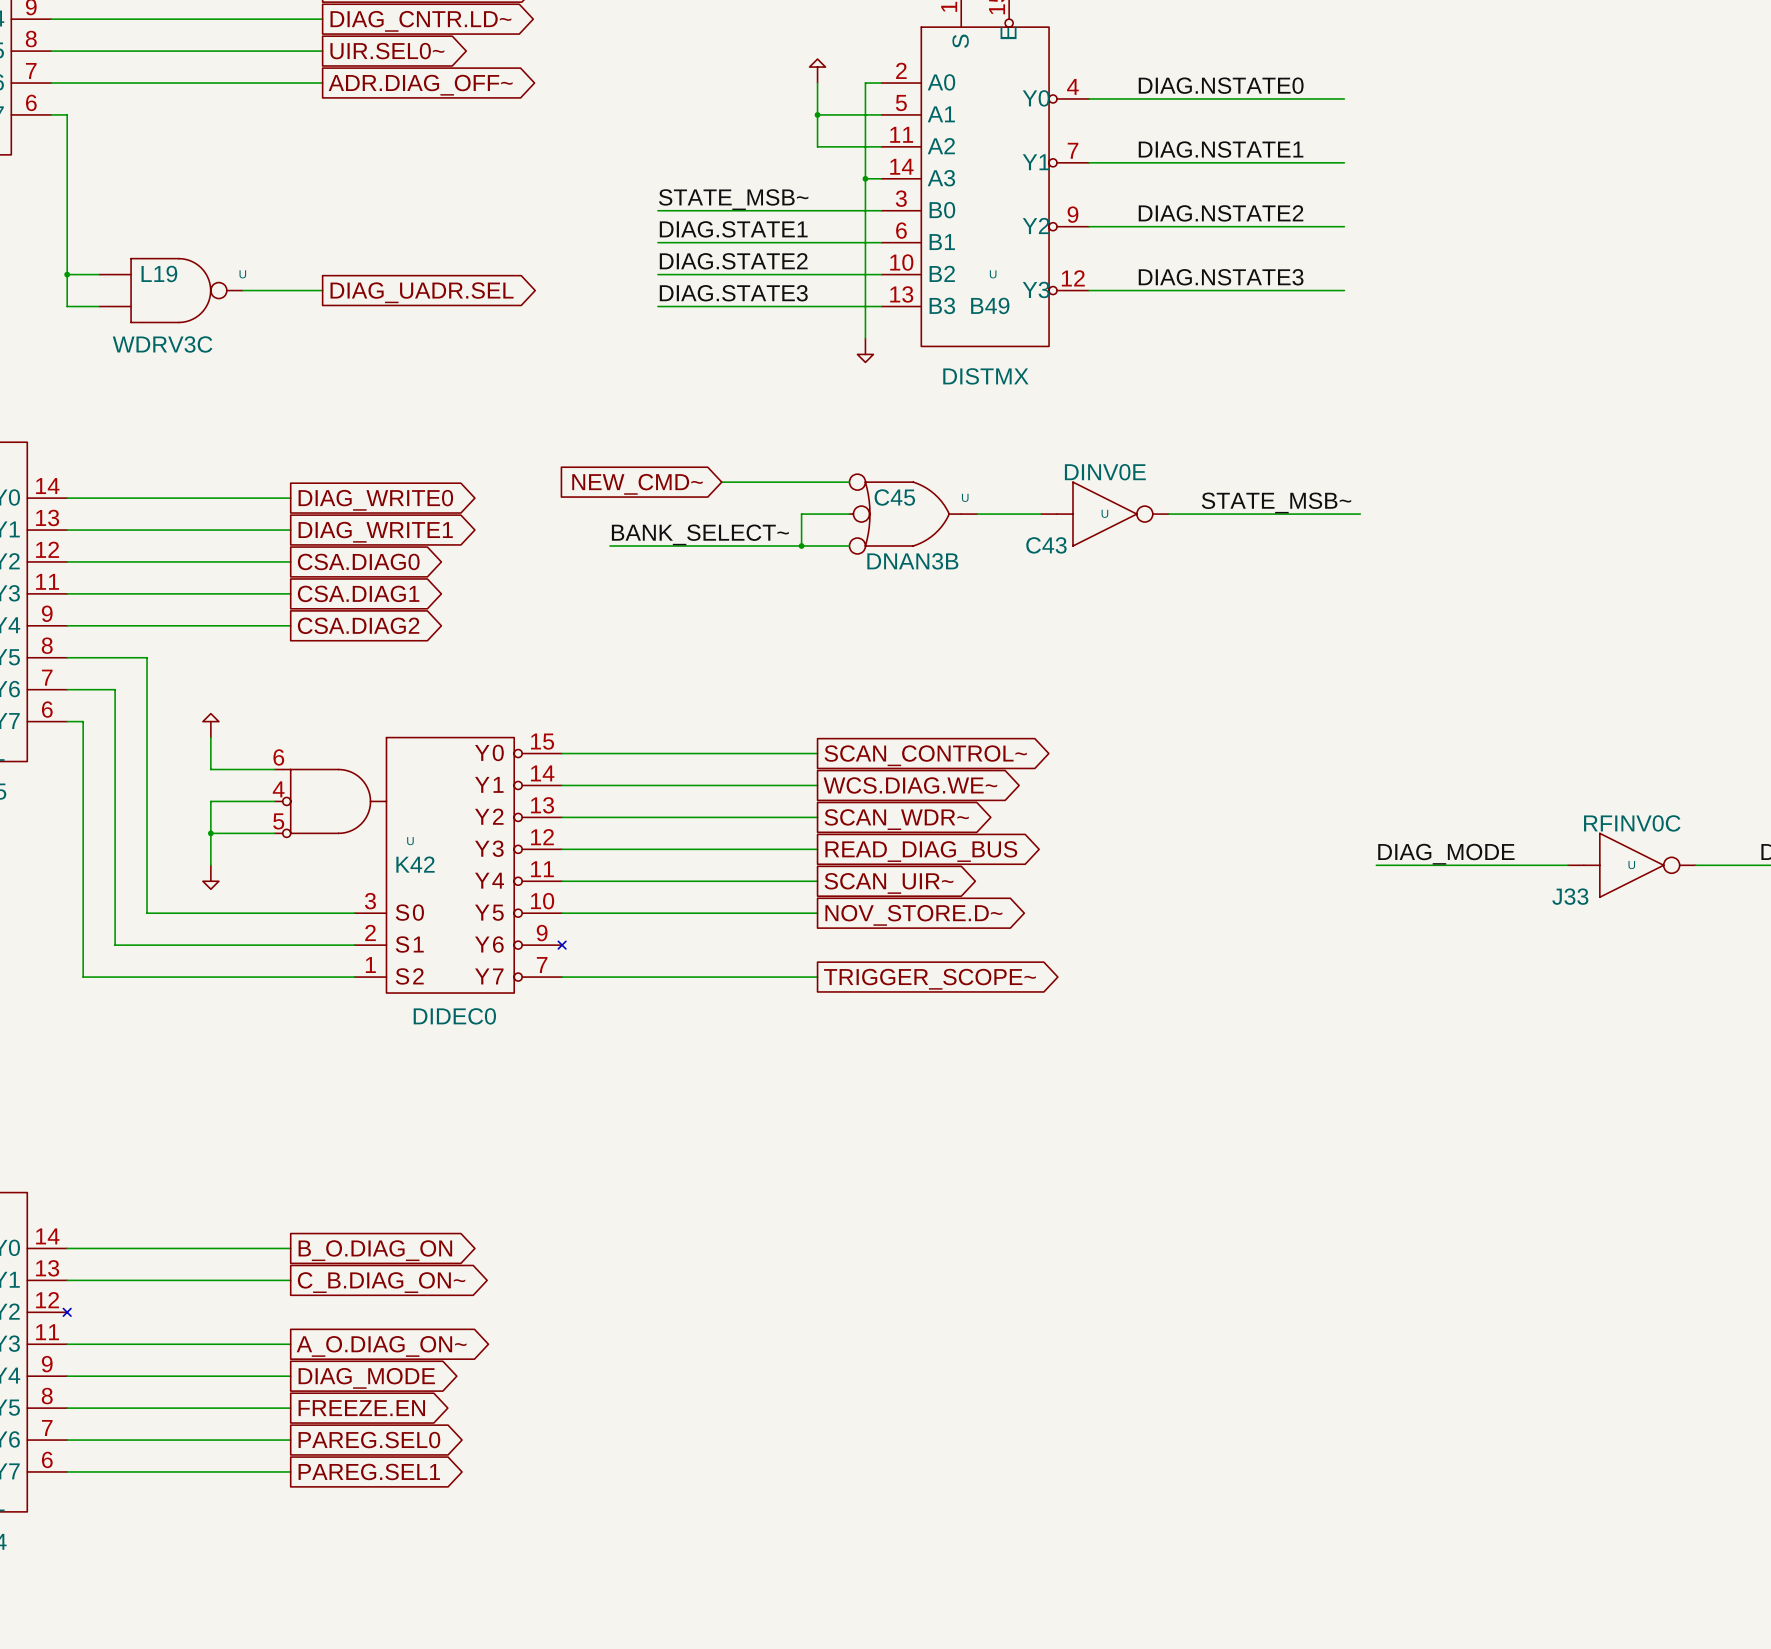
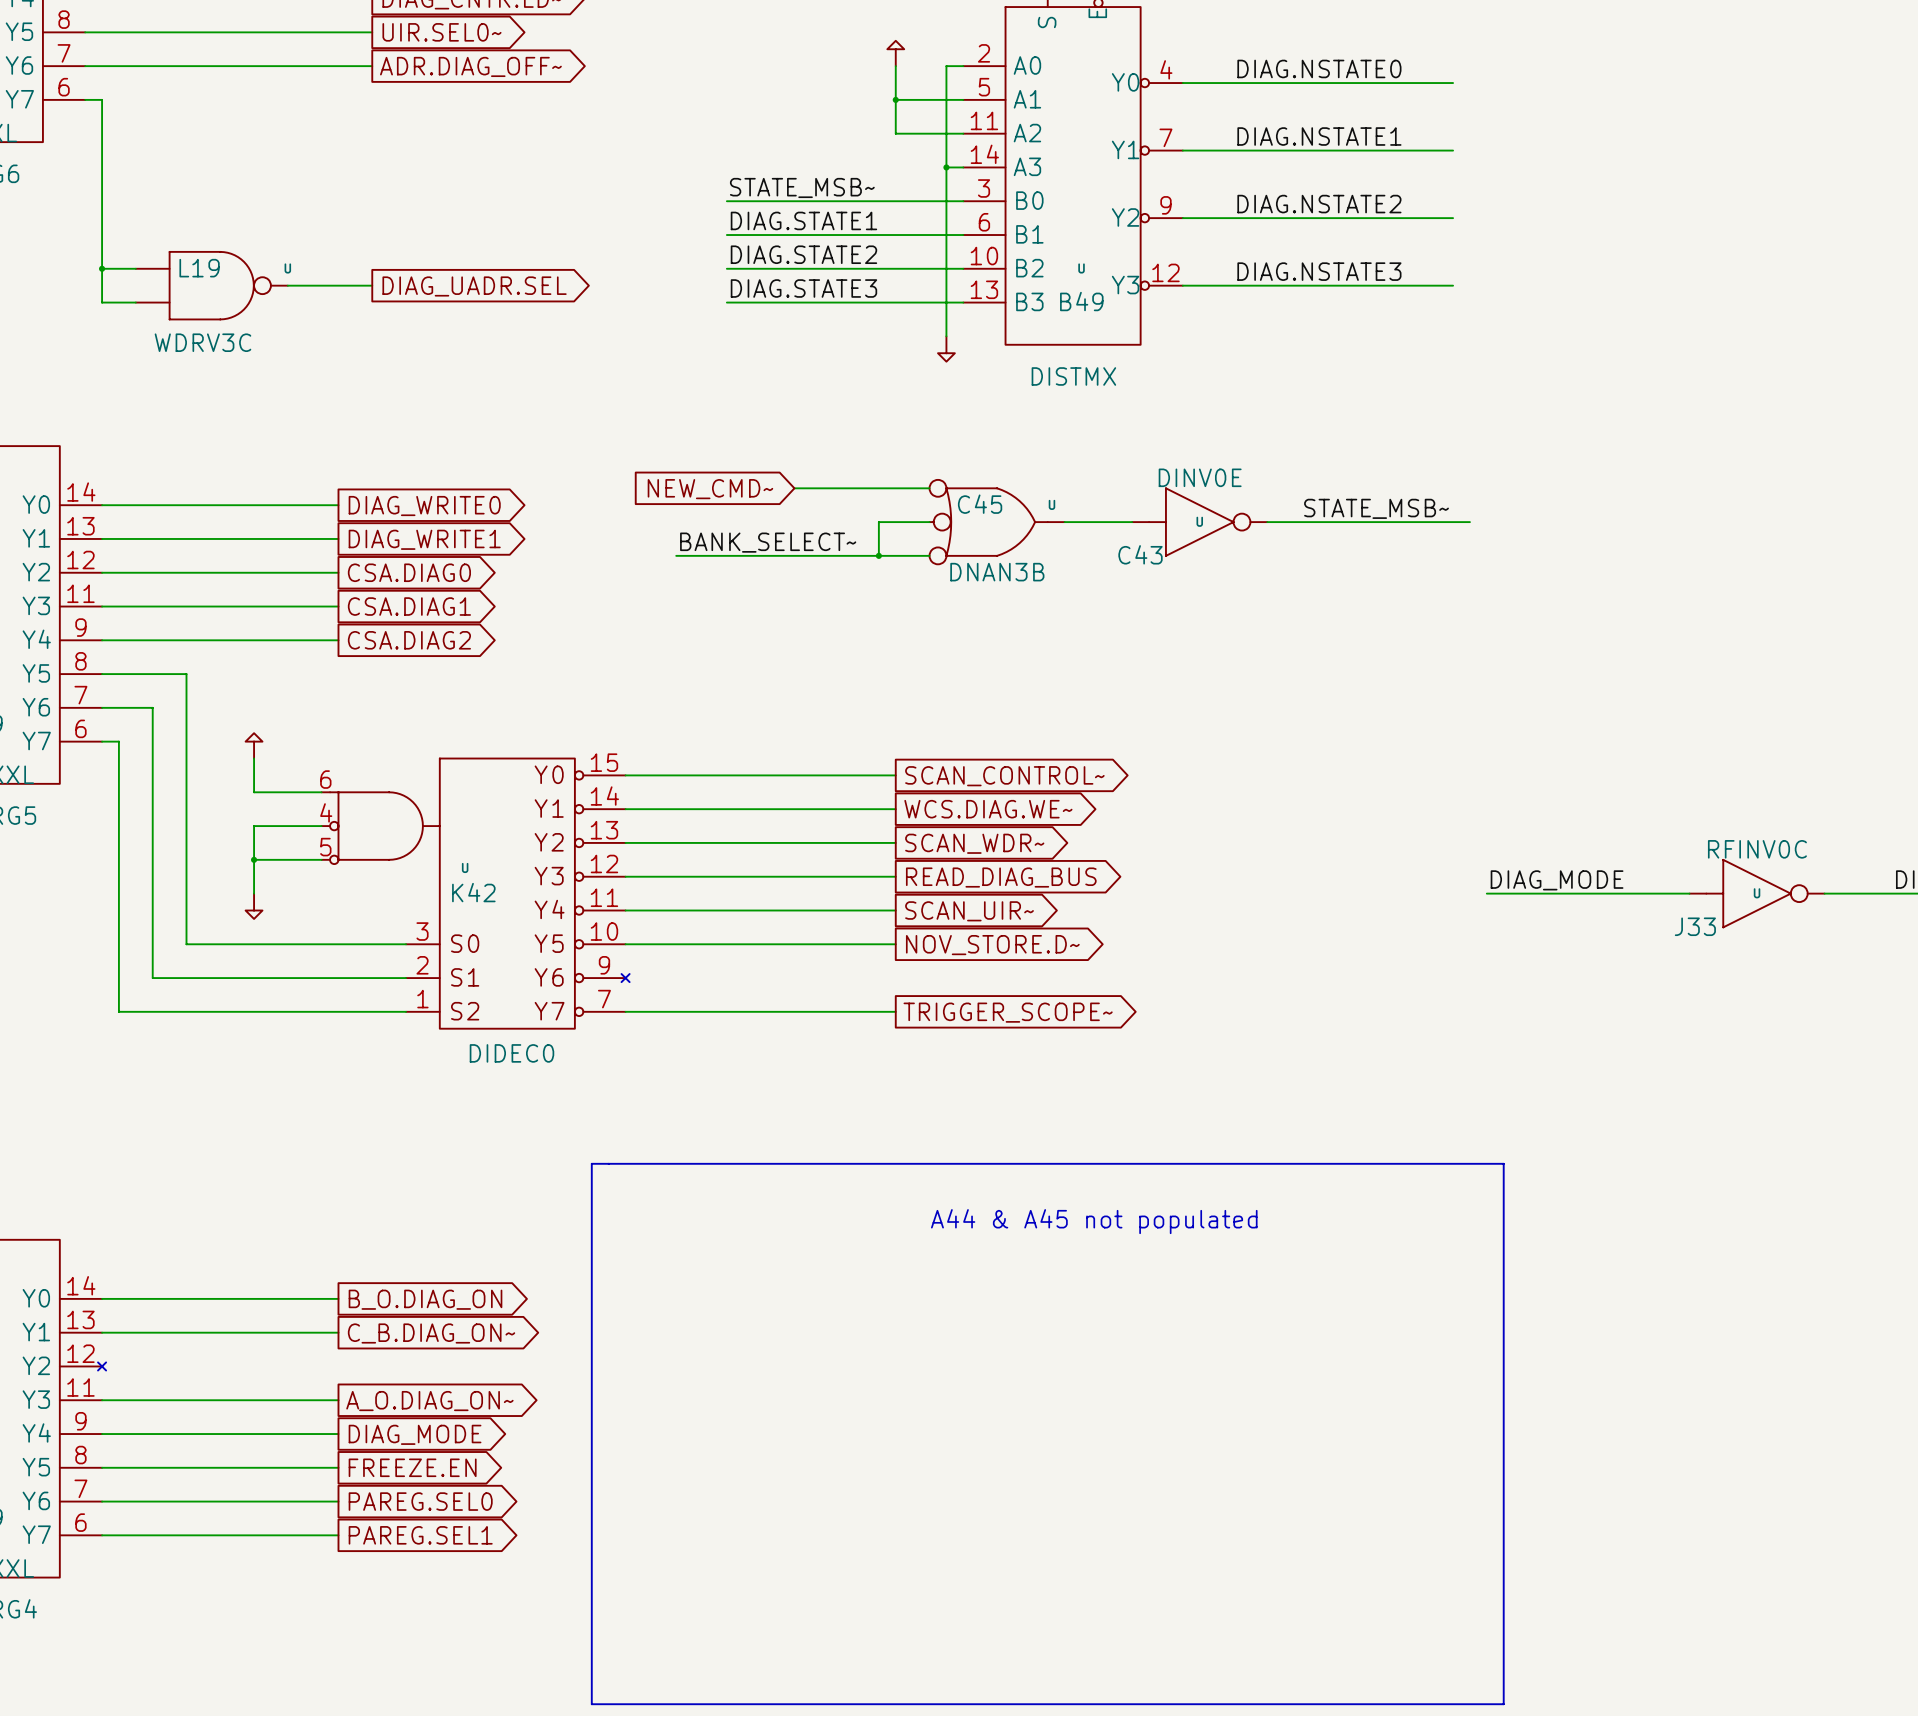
line: none -> (591, 1163) (591, 1704) (1503, 1704) (1503, 1163) (591, 1163)
text: none -> A44 & A45 not populated (1094, 1221)

